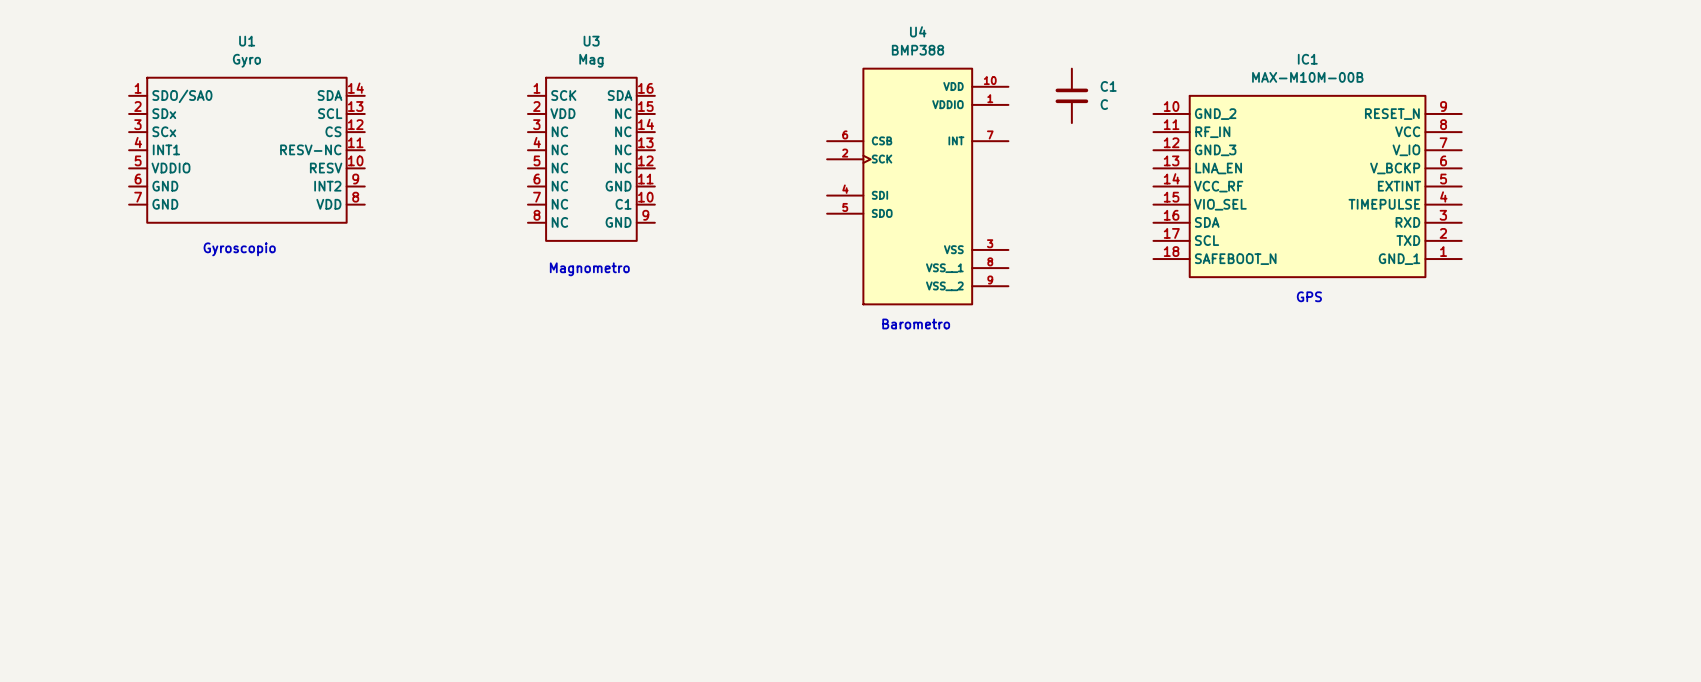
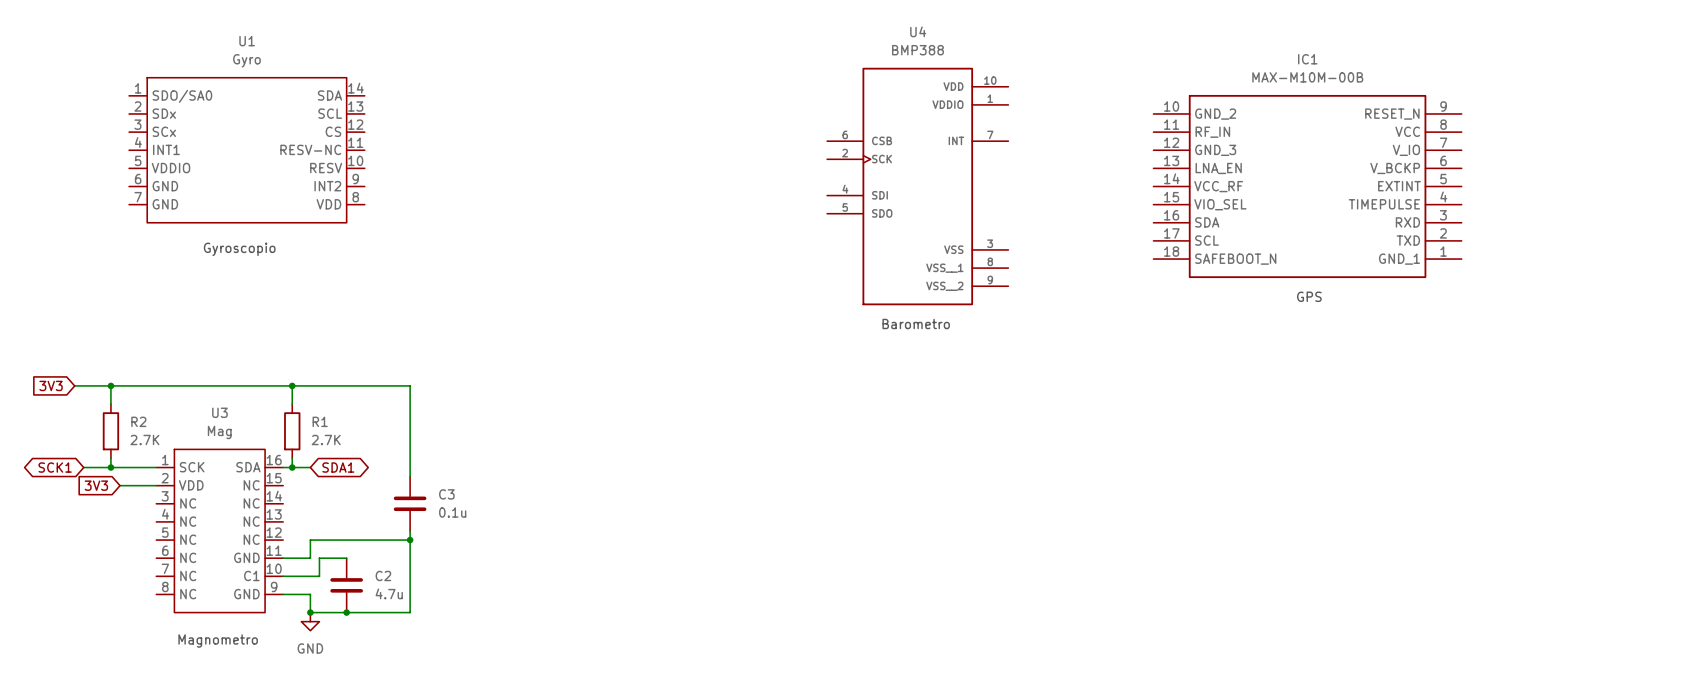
C1: C (1071, 95) -> none
U3 position: (591, 159) -> (219, 530)
text: Magnometro (589, 269) -> none
global label: none -> 3V3 (51, 385)
wire: none -> (74, 385) (410, 385) (410, 476)
wire: none -> (110, 385) (110, 404)
junction: none -> (110, 385)
wire: none -> (292, 385) (292, 404)
junction: none -> (292, 385)
R2: none -> 2.7K (110, 431)
R1: none -> 2.7K (292, 431)
wire: none -> (110, 458) (110, 467)
wire: none -> (292, 458) (292, 467)
global label: none -> SCK1 (55, 467)
wire: none -> (83, 467) (156, 467)
junction: none -> (110, 467)
wire: none -> (283, 467) (310, 467)
junction: none -> (292, 467)
global label: none -> SDA1 (338, 467)
global label: none -> 3V3 (96, 485)
wire: none -> (120, 485) (156, 485)
C3: none -> 0.1u (410, 503)
wire: none -> (410, 530) (410, 612) (310, 612) (310, 594) (283, 594)
wire: none -> (410, 540) (310, 540) (310, 558) (283, 558)
junction: none -> (410, 540)
wire: none -> (346, 558) (319, 558) (319, 576) (283, 576)
C2: none -> 4.7u (346, 585)
junction: none -> (310, 612)
junction: none -> (346, 612)
power symbol: none -> GND (310, 621)
text: none -> Magnometro (218, 640)

